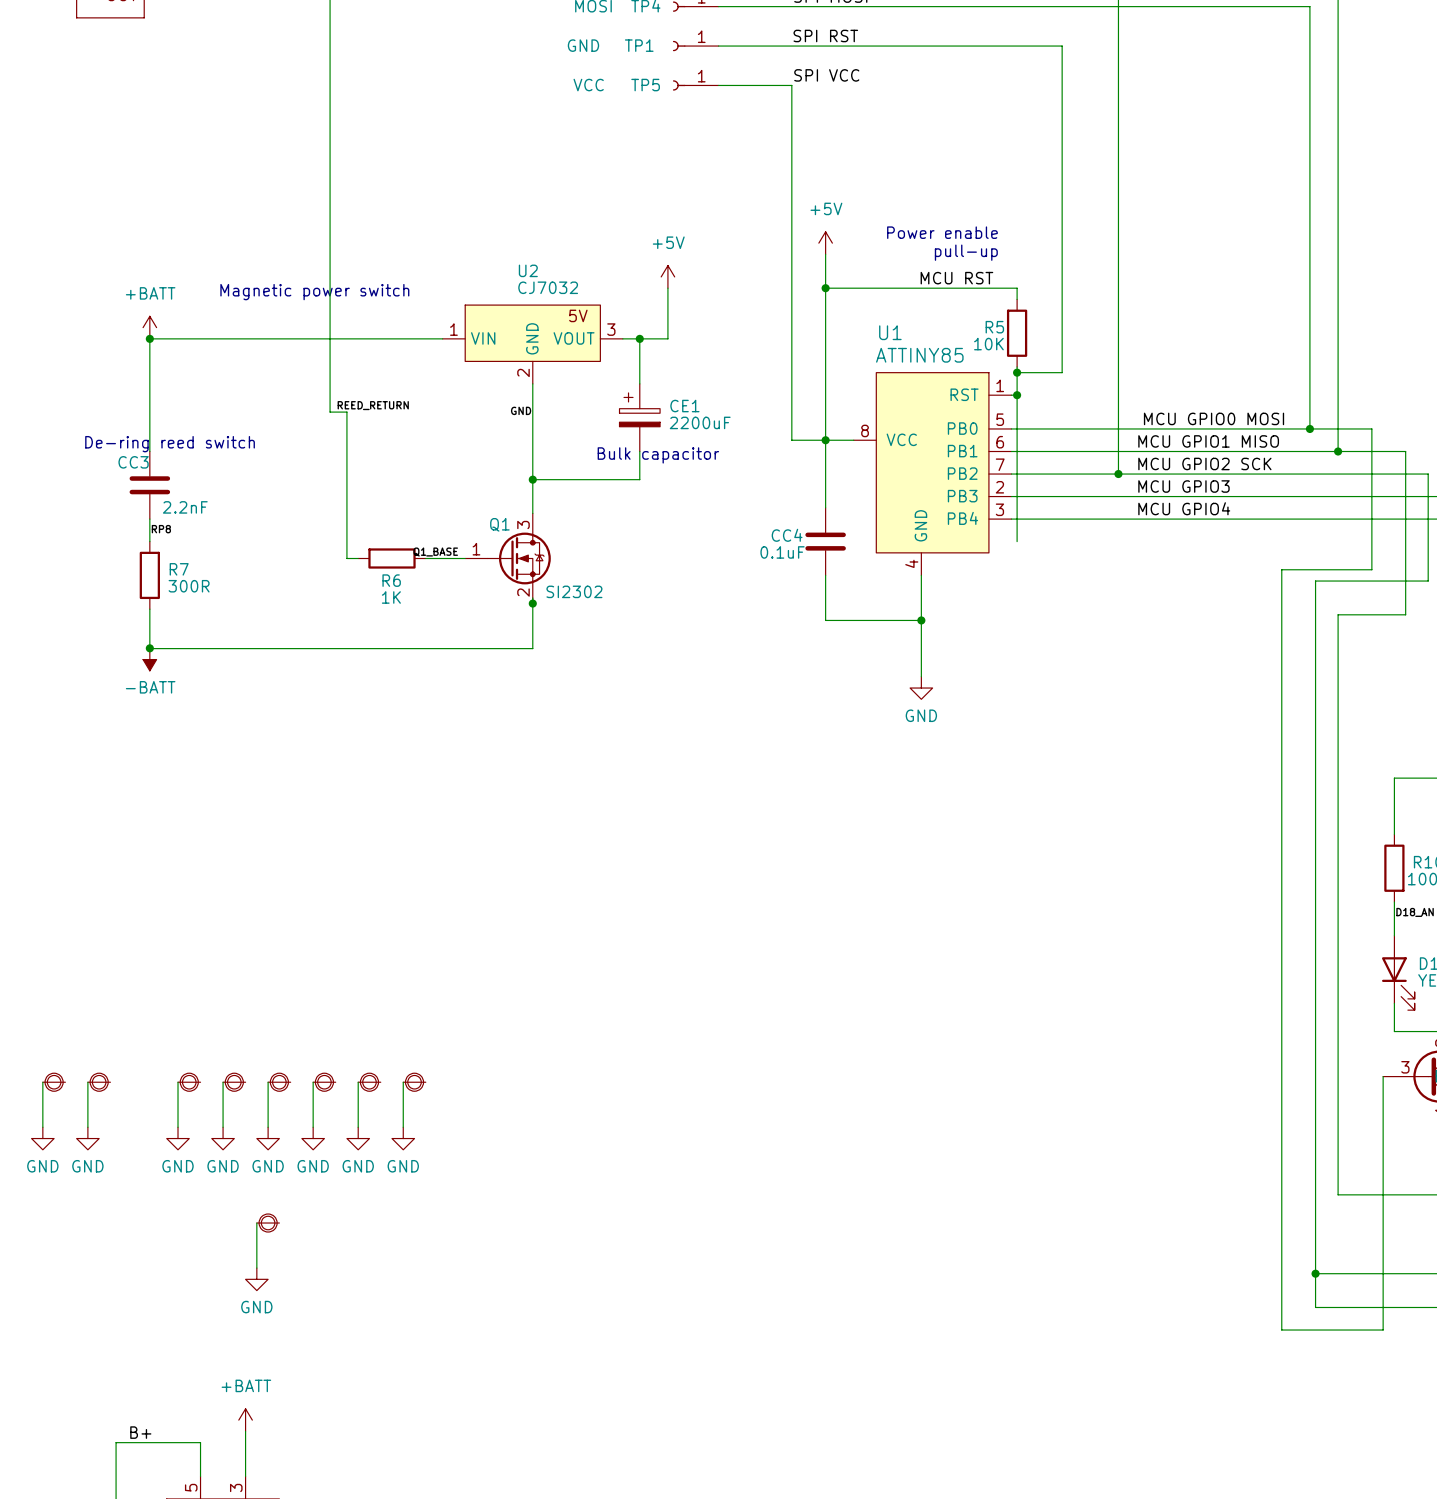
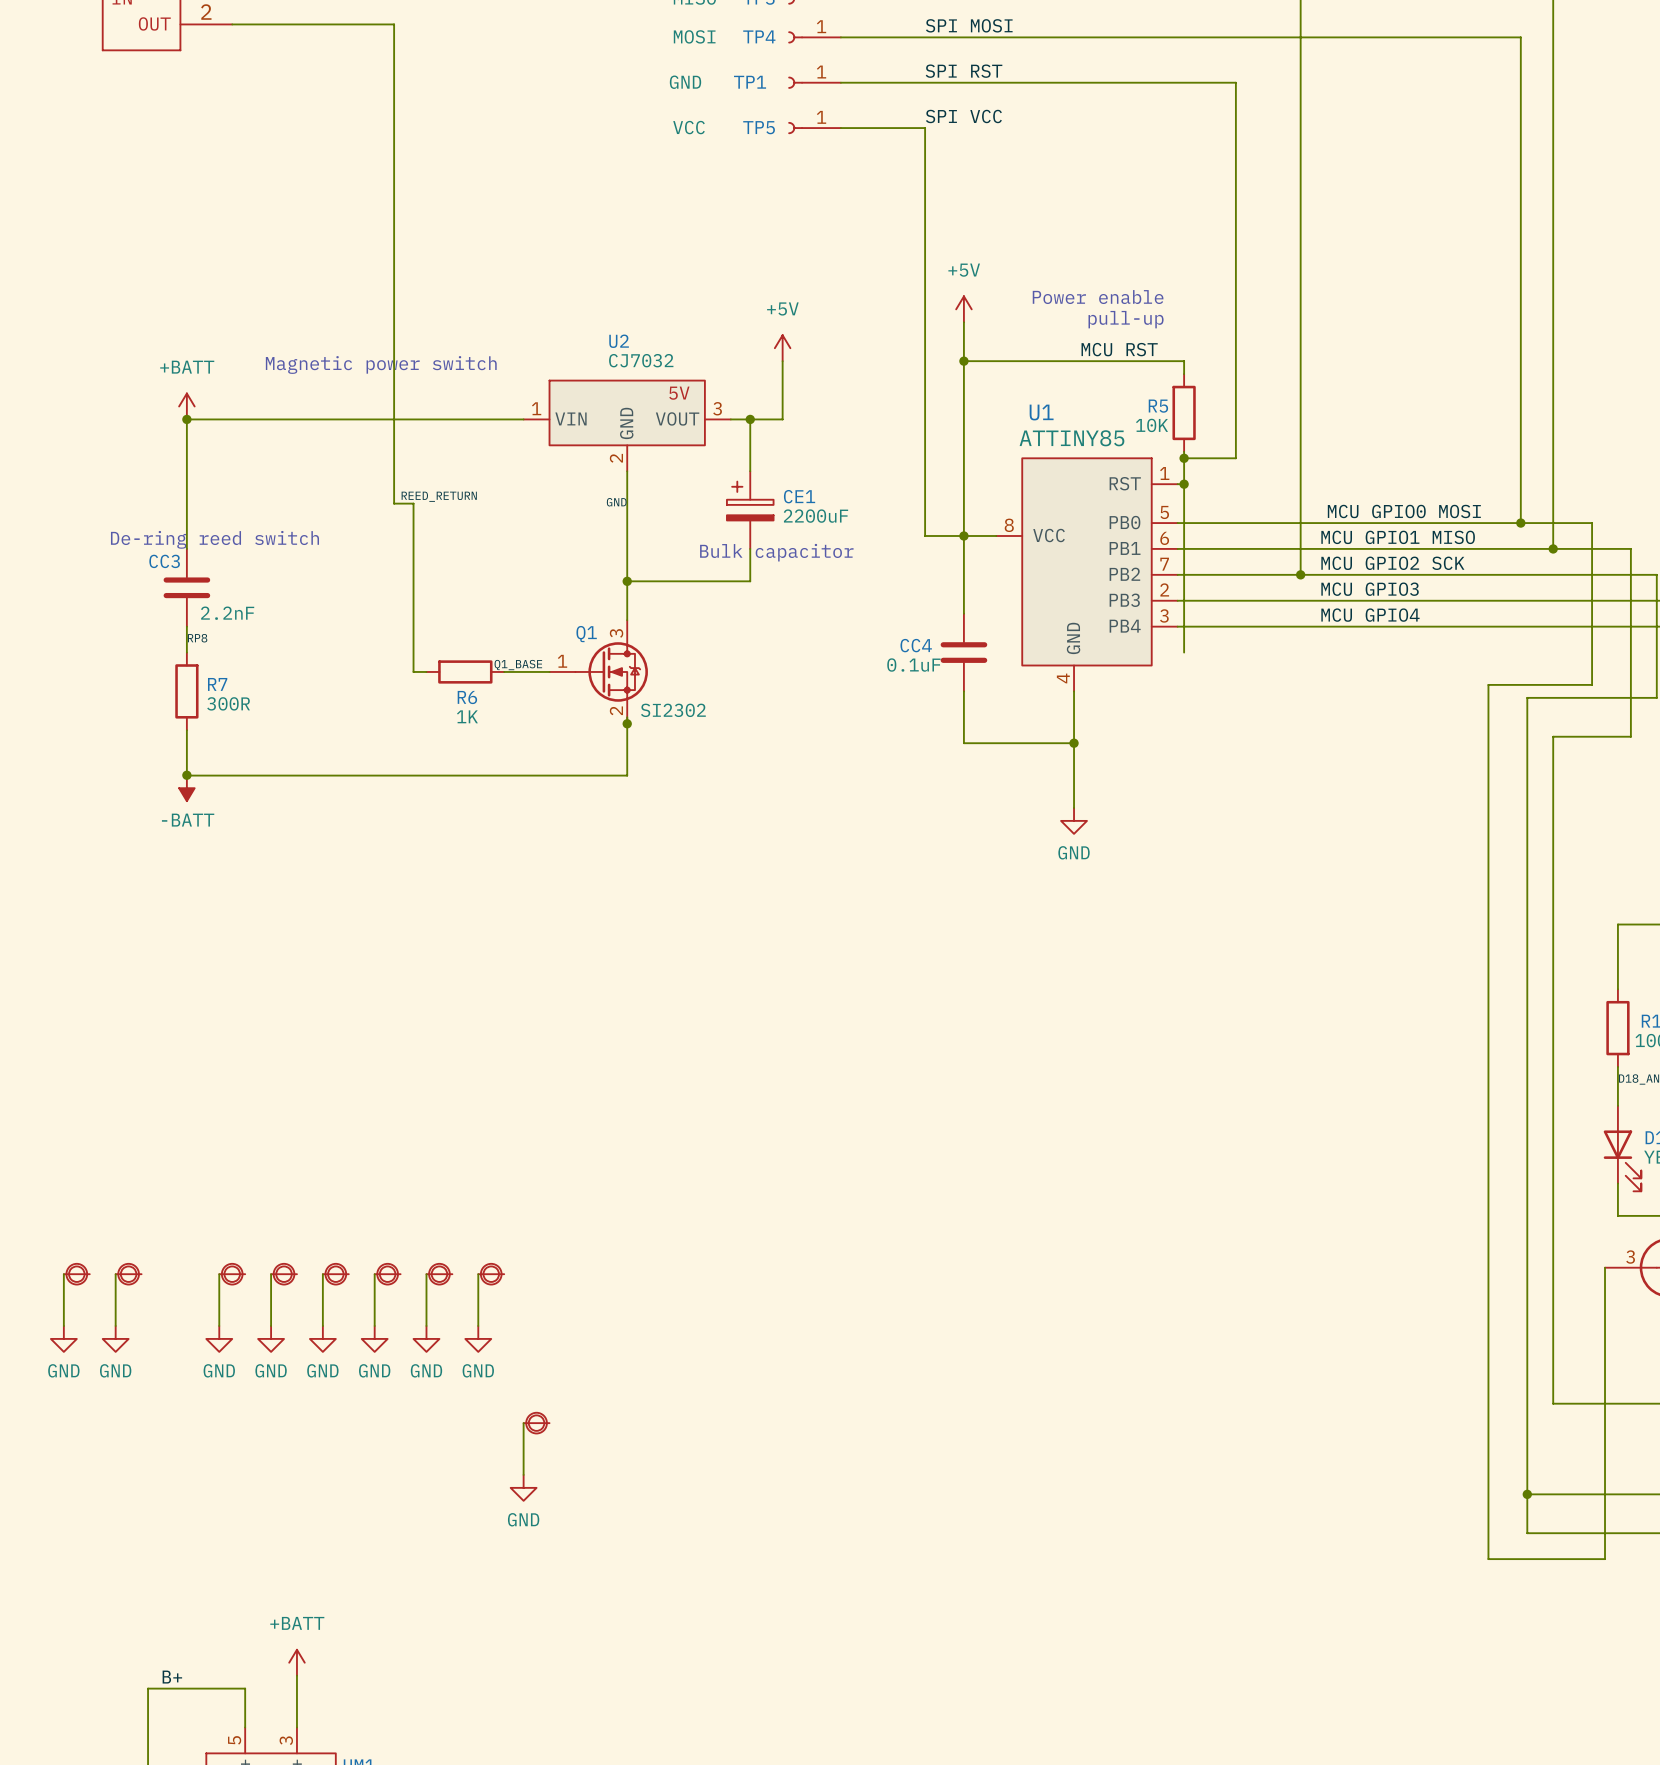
wire: (256, 1223) (256, 1268) -> (523, 1423) (523, 1474)
part position: (268, 1223) -> (536, 1423)
power symbol position: GND (256, 1279) -> GND (523, 1487)

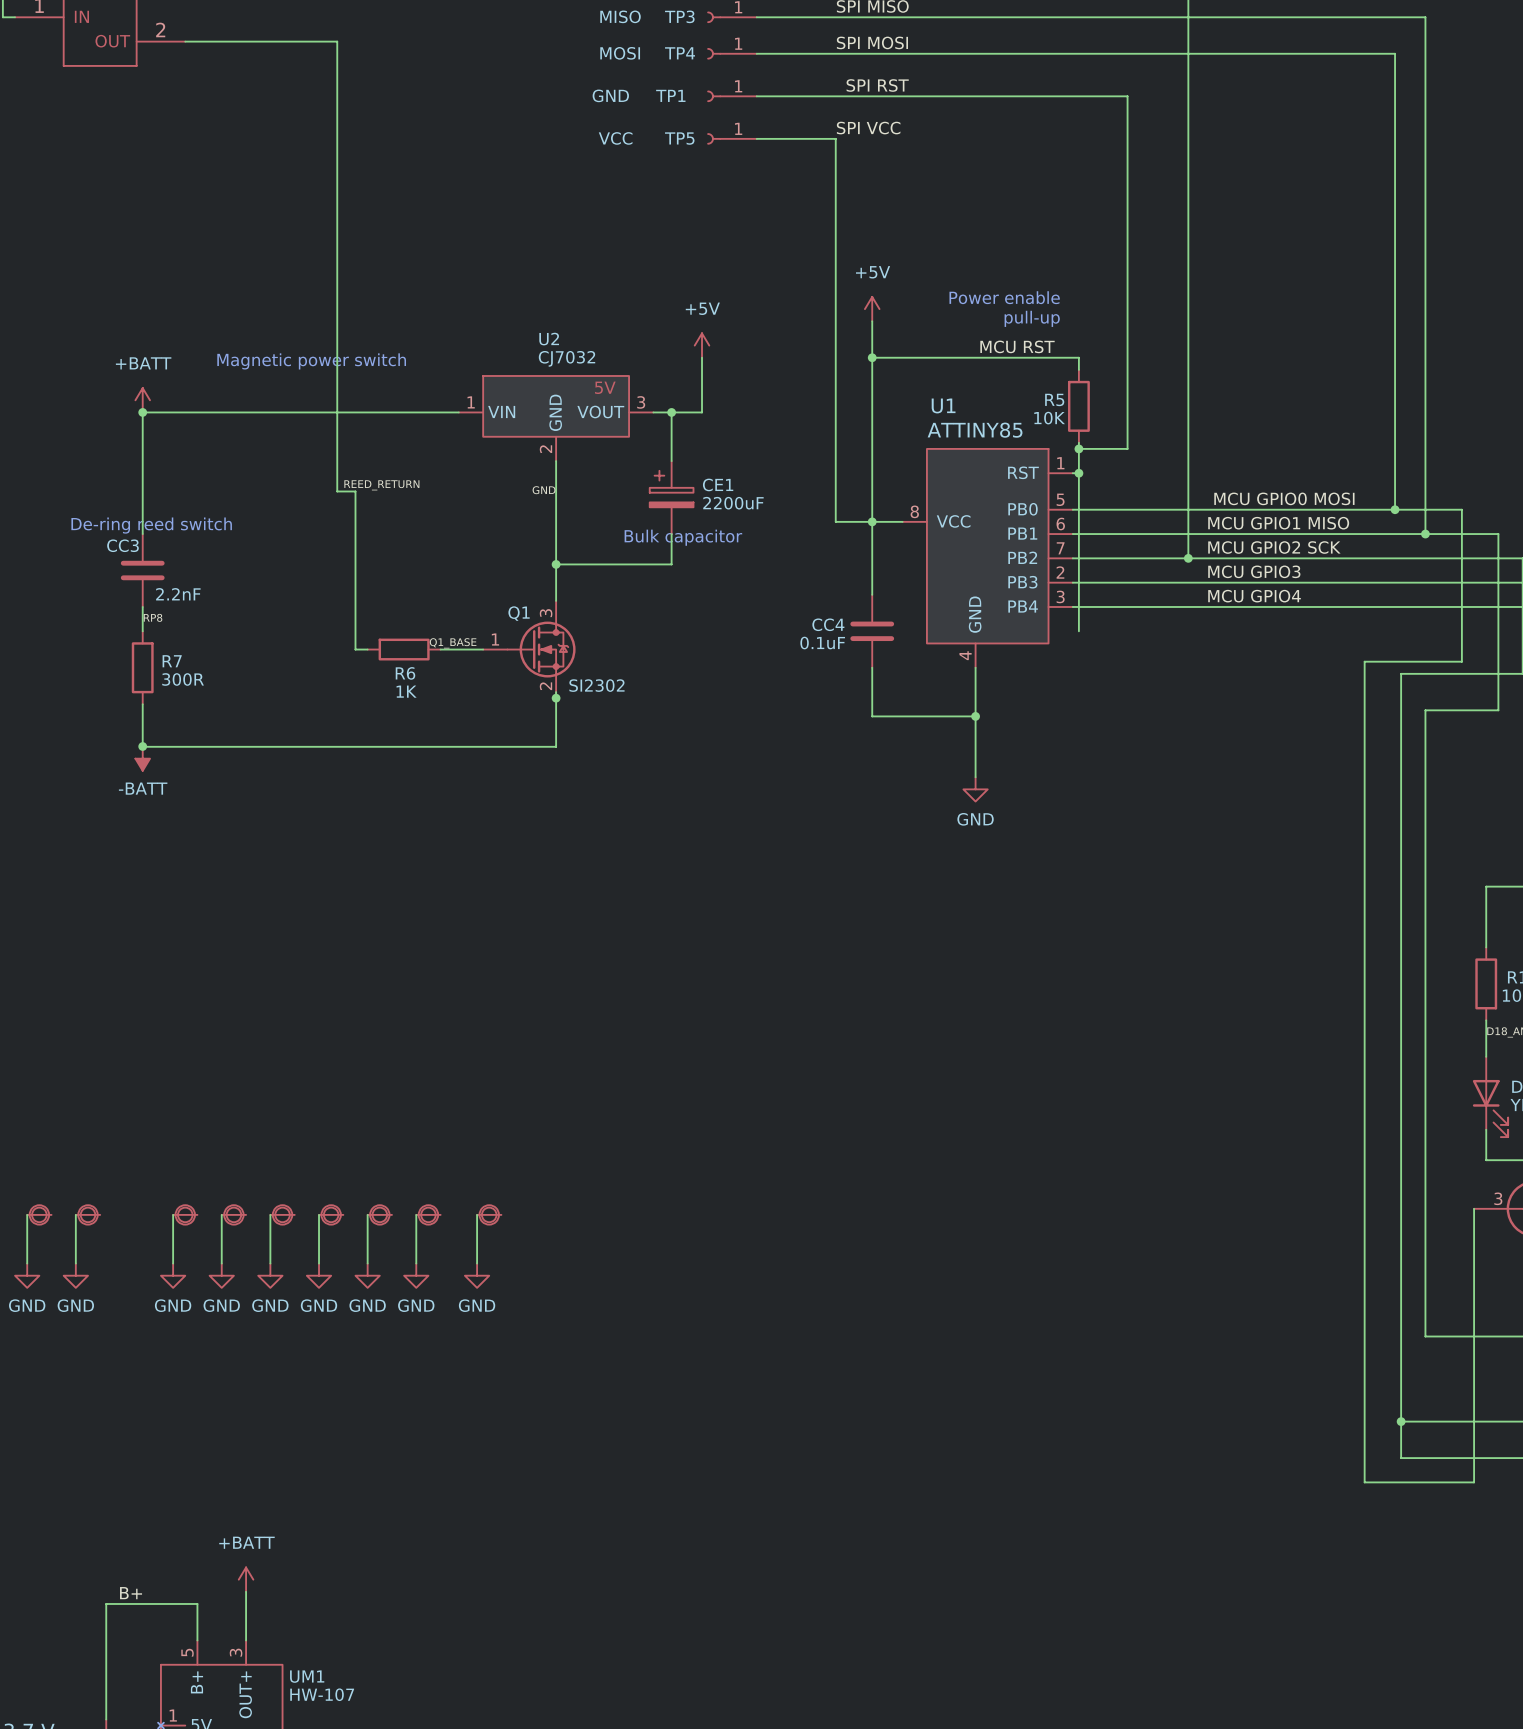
wire: (523, 1423) (523, 1474) -> (477, 1214) (477, 1263)
part position: (536, 1423) -> (489, 1214)
power symbol position: GND (523, 1487) -> GND (477, 1275)

